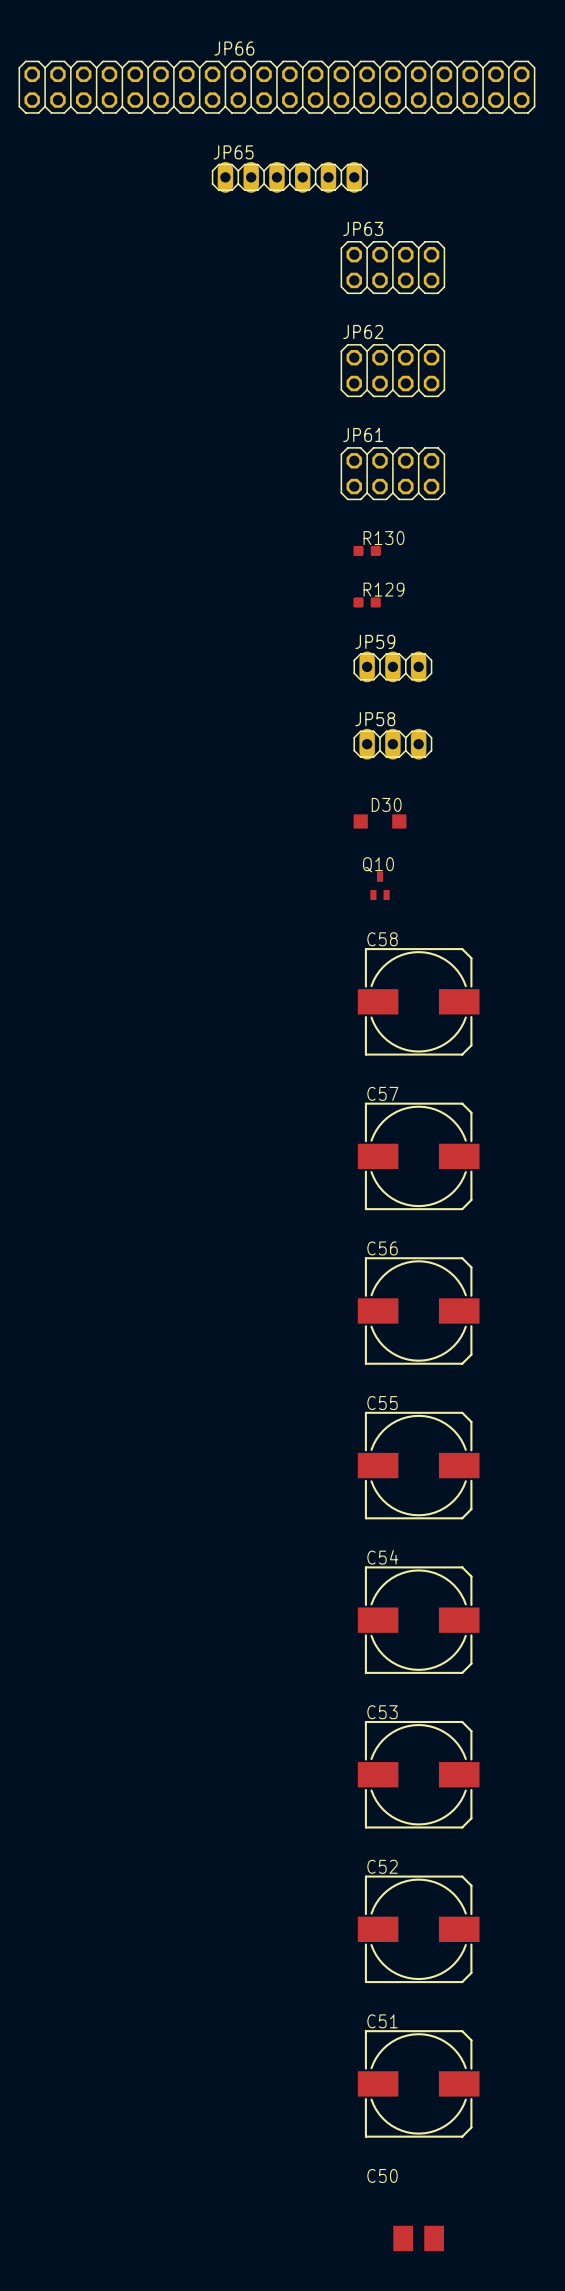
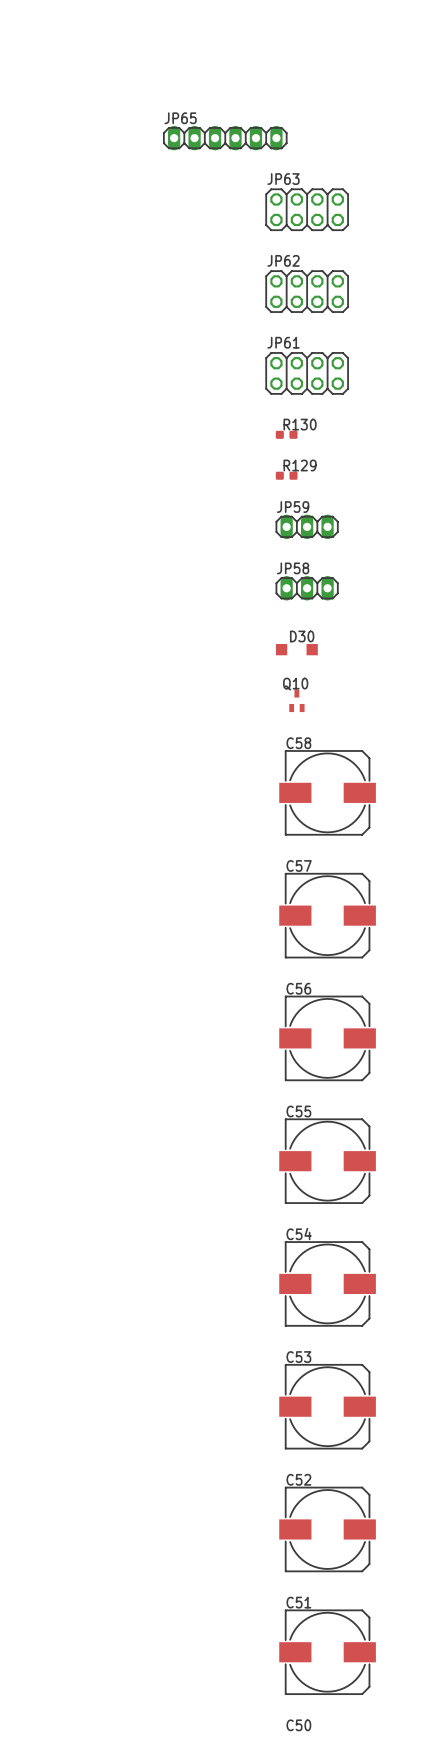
JP66: (276, 87) -> none

